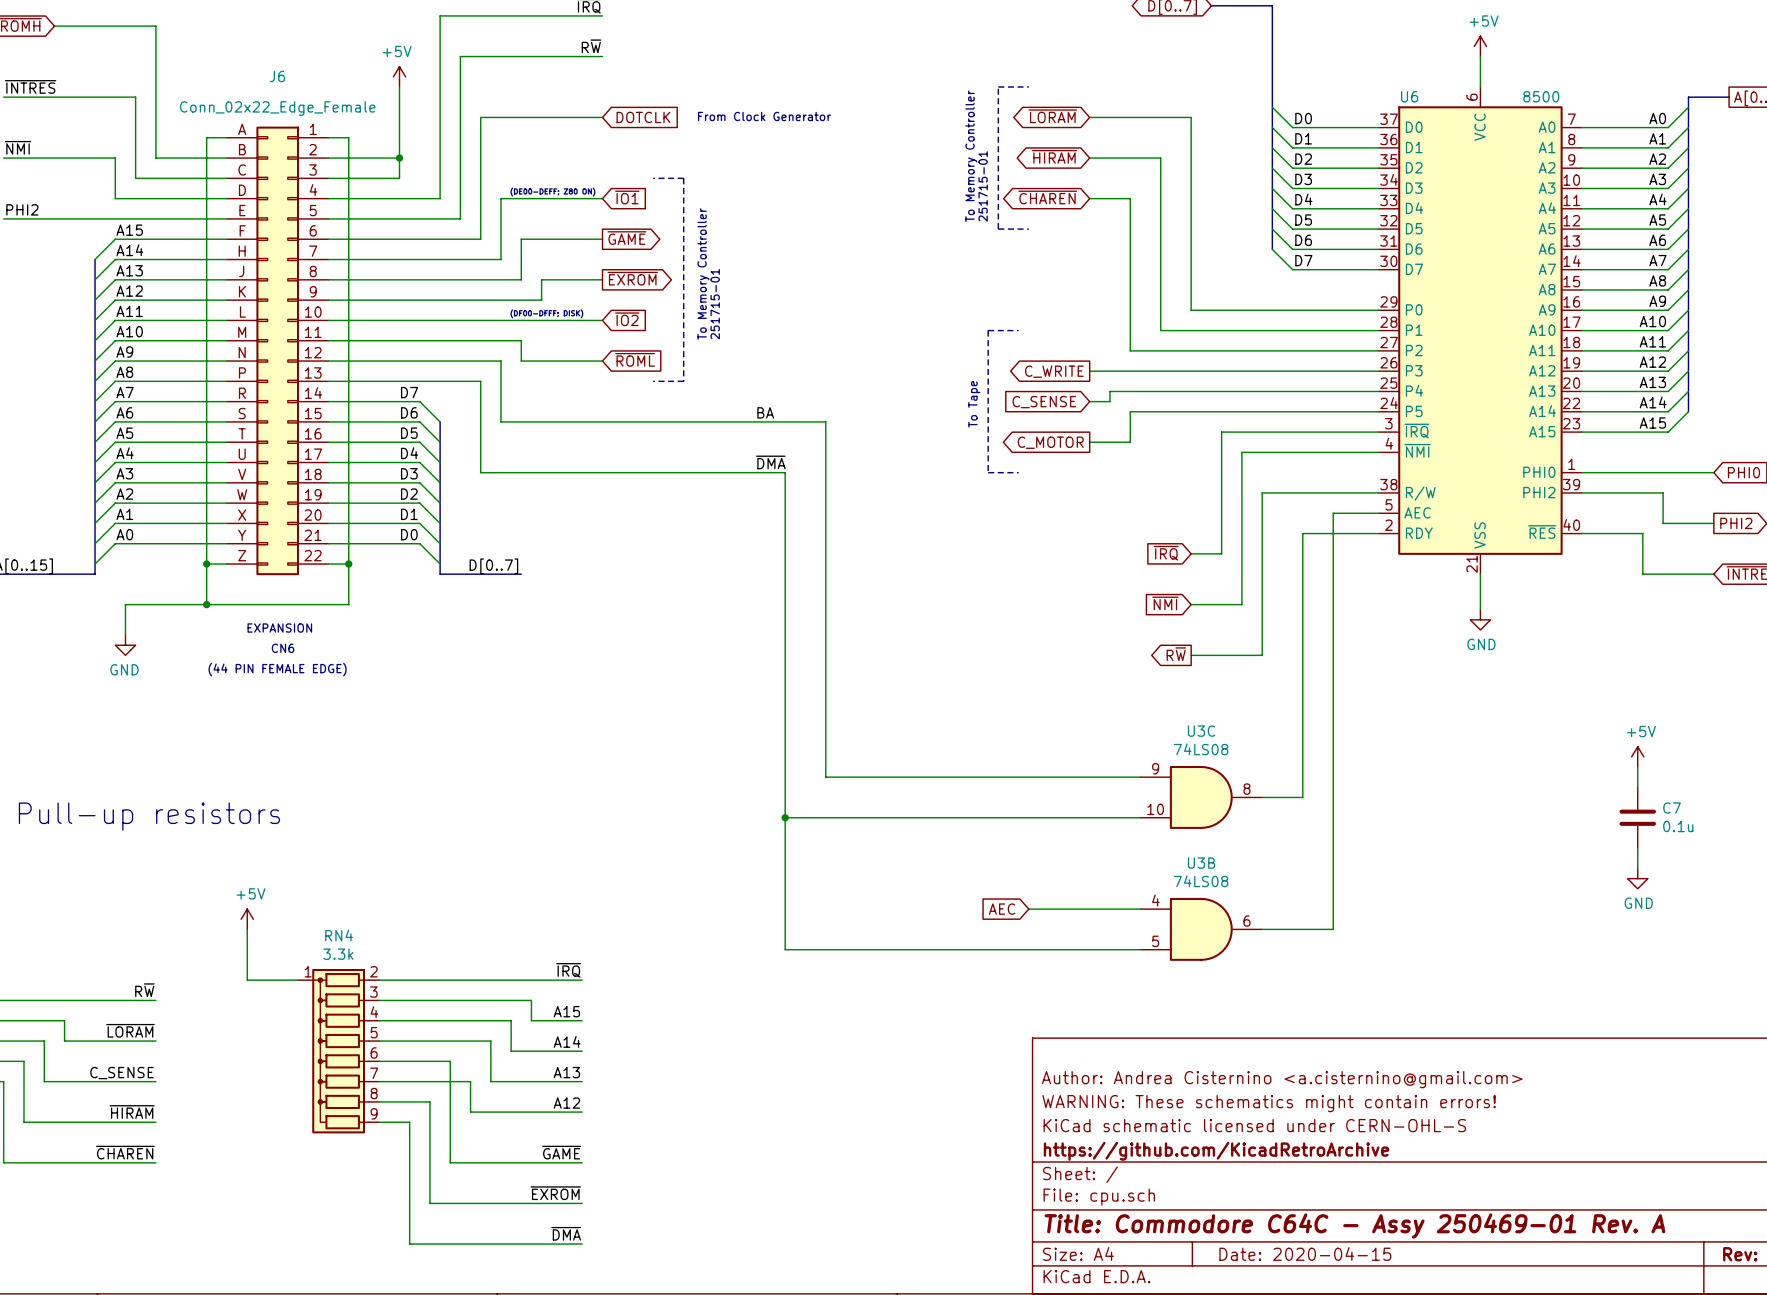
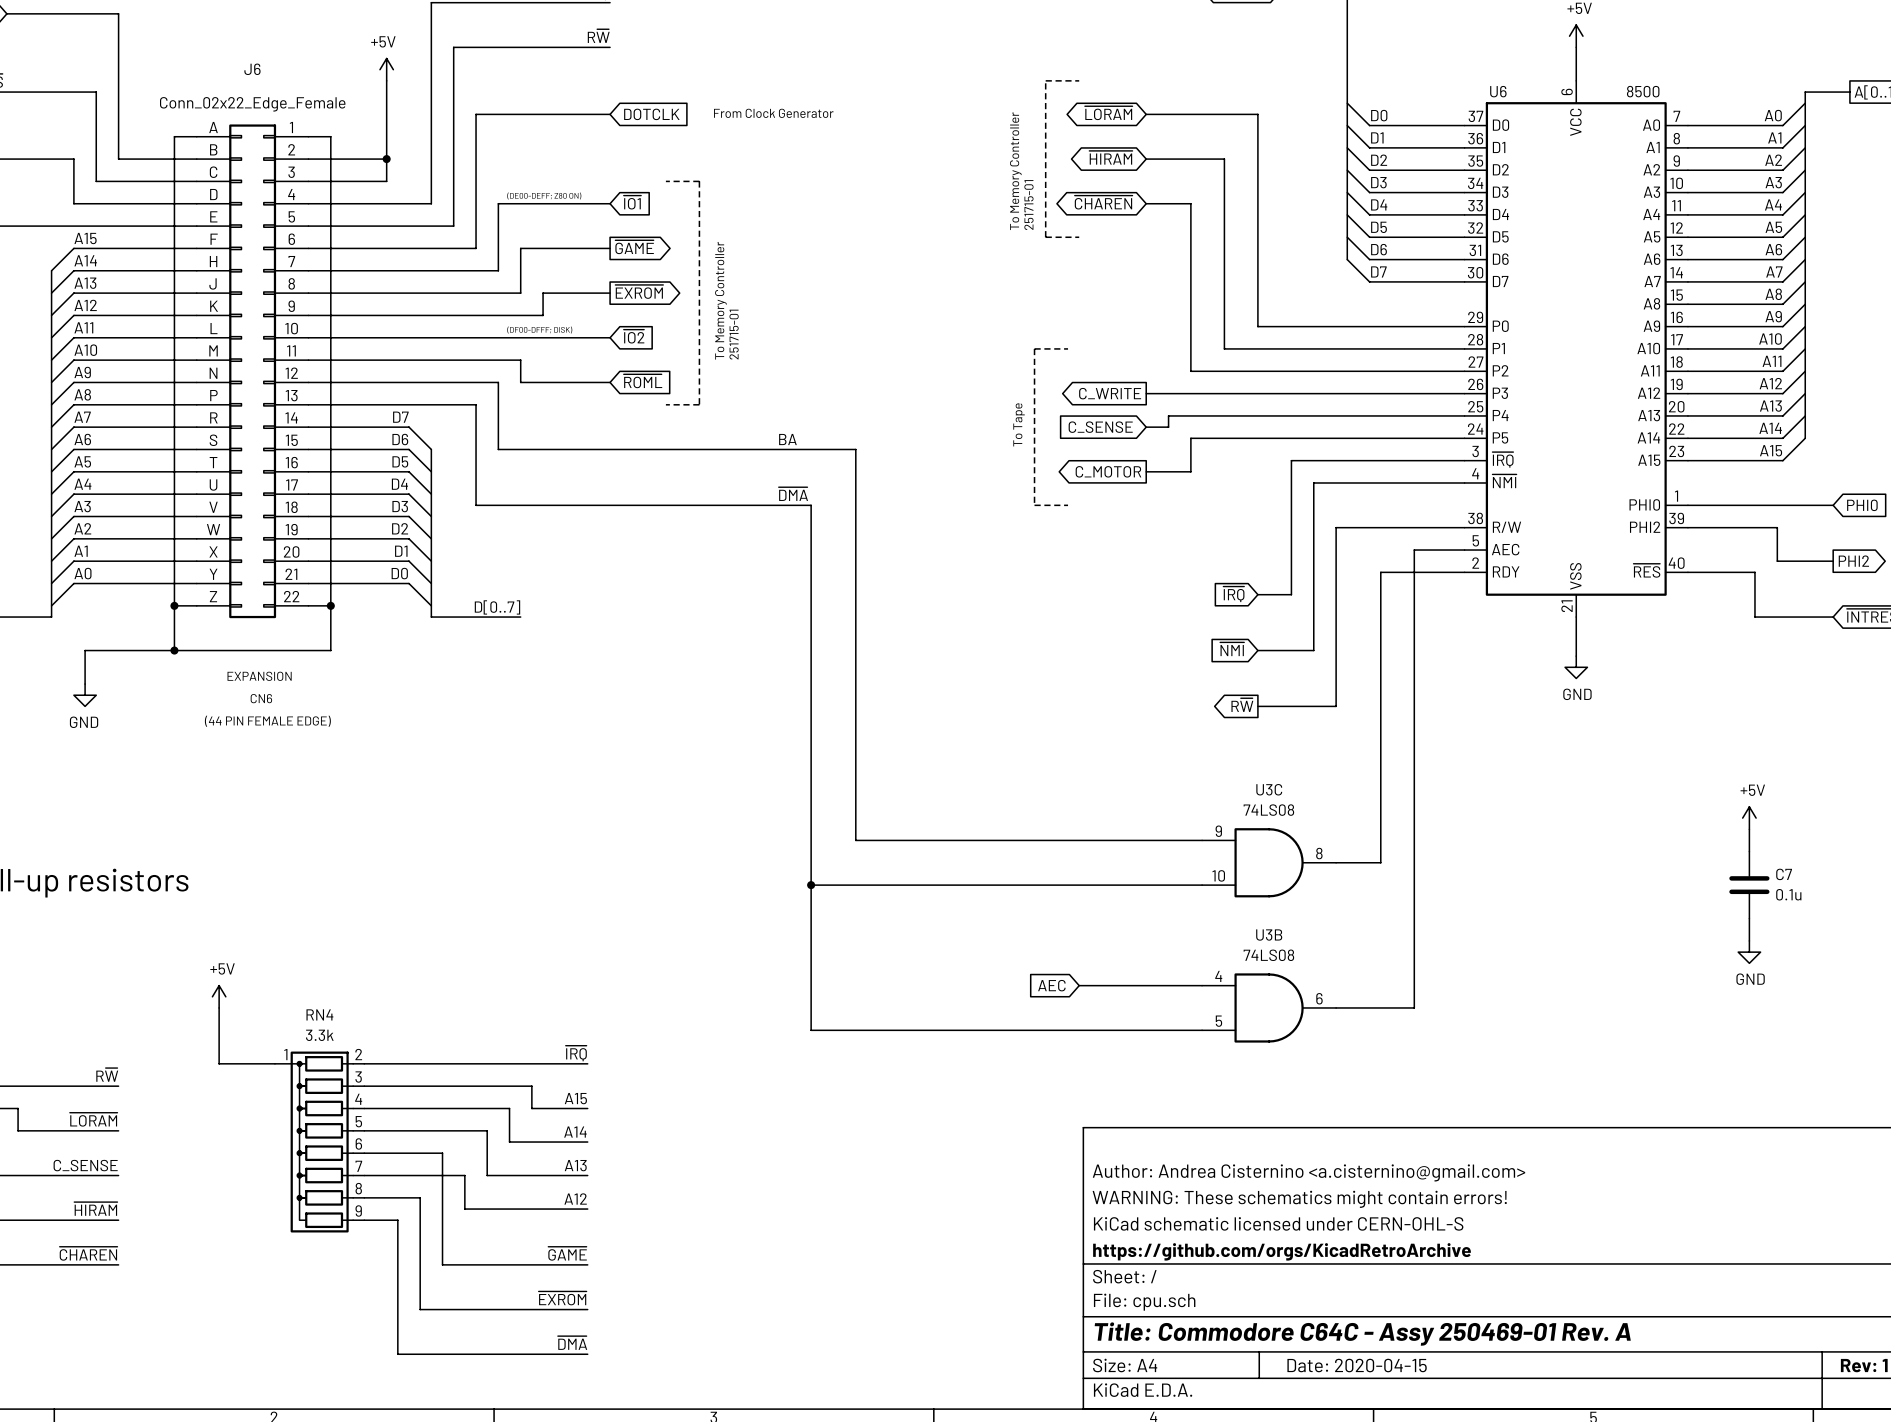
title block: https://github.com/KicadRetroArchive (1216, 1151) -> https://github.com/orgs/KicadRetroArchive (1282, 1251)

